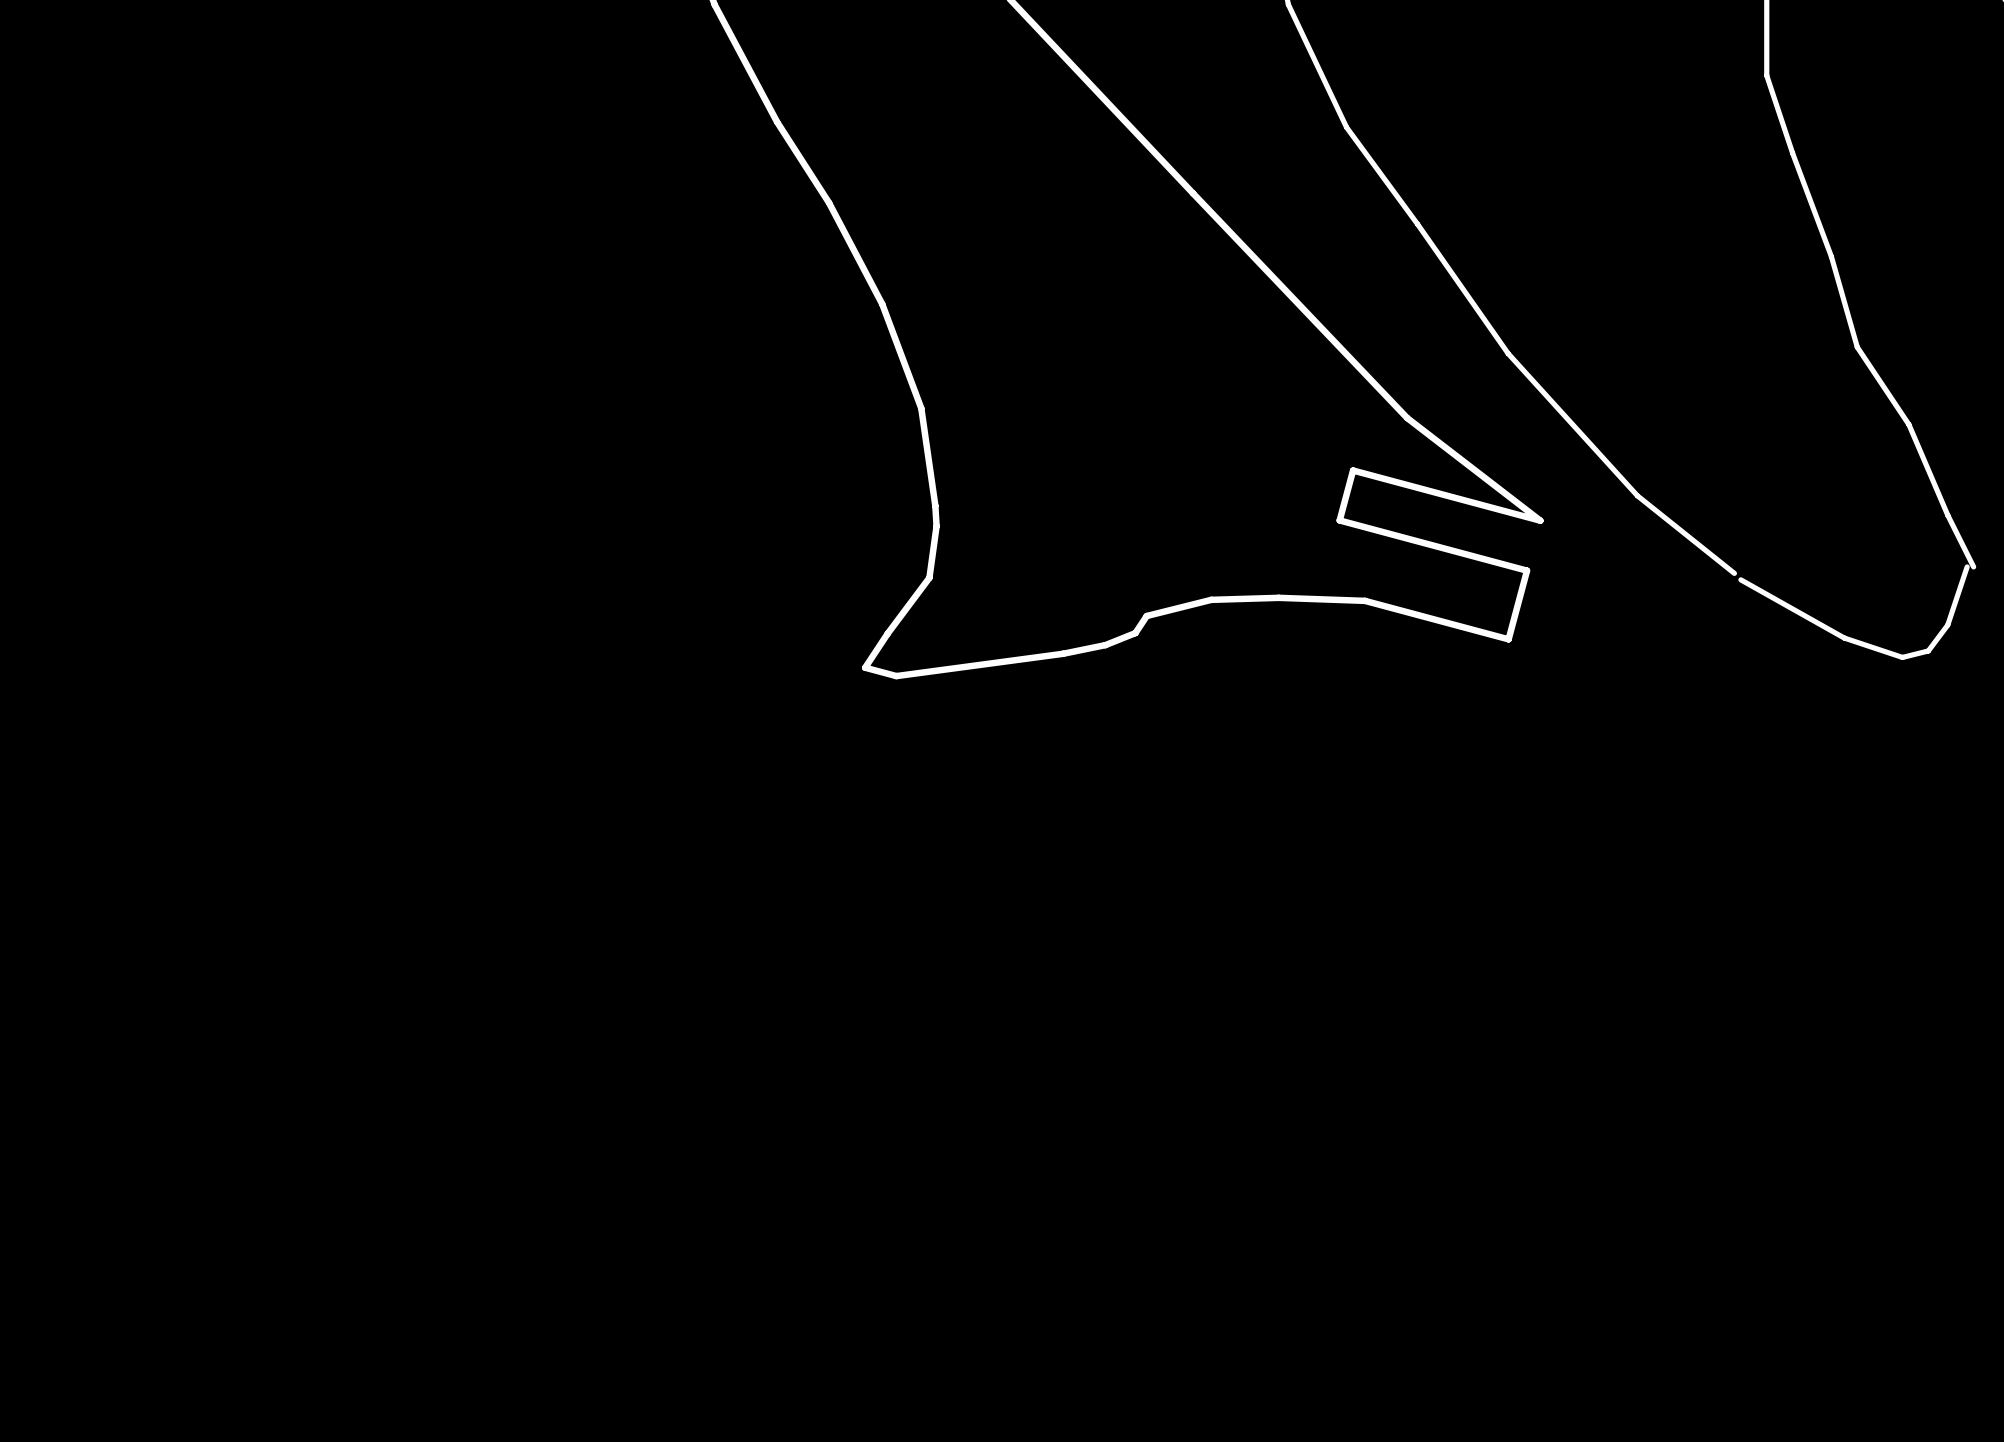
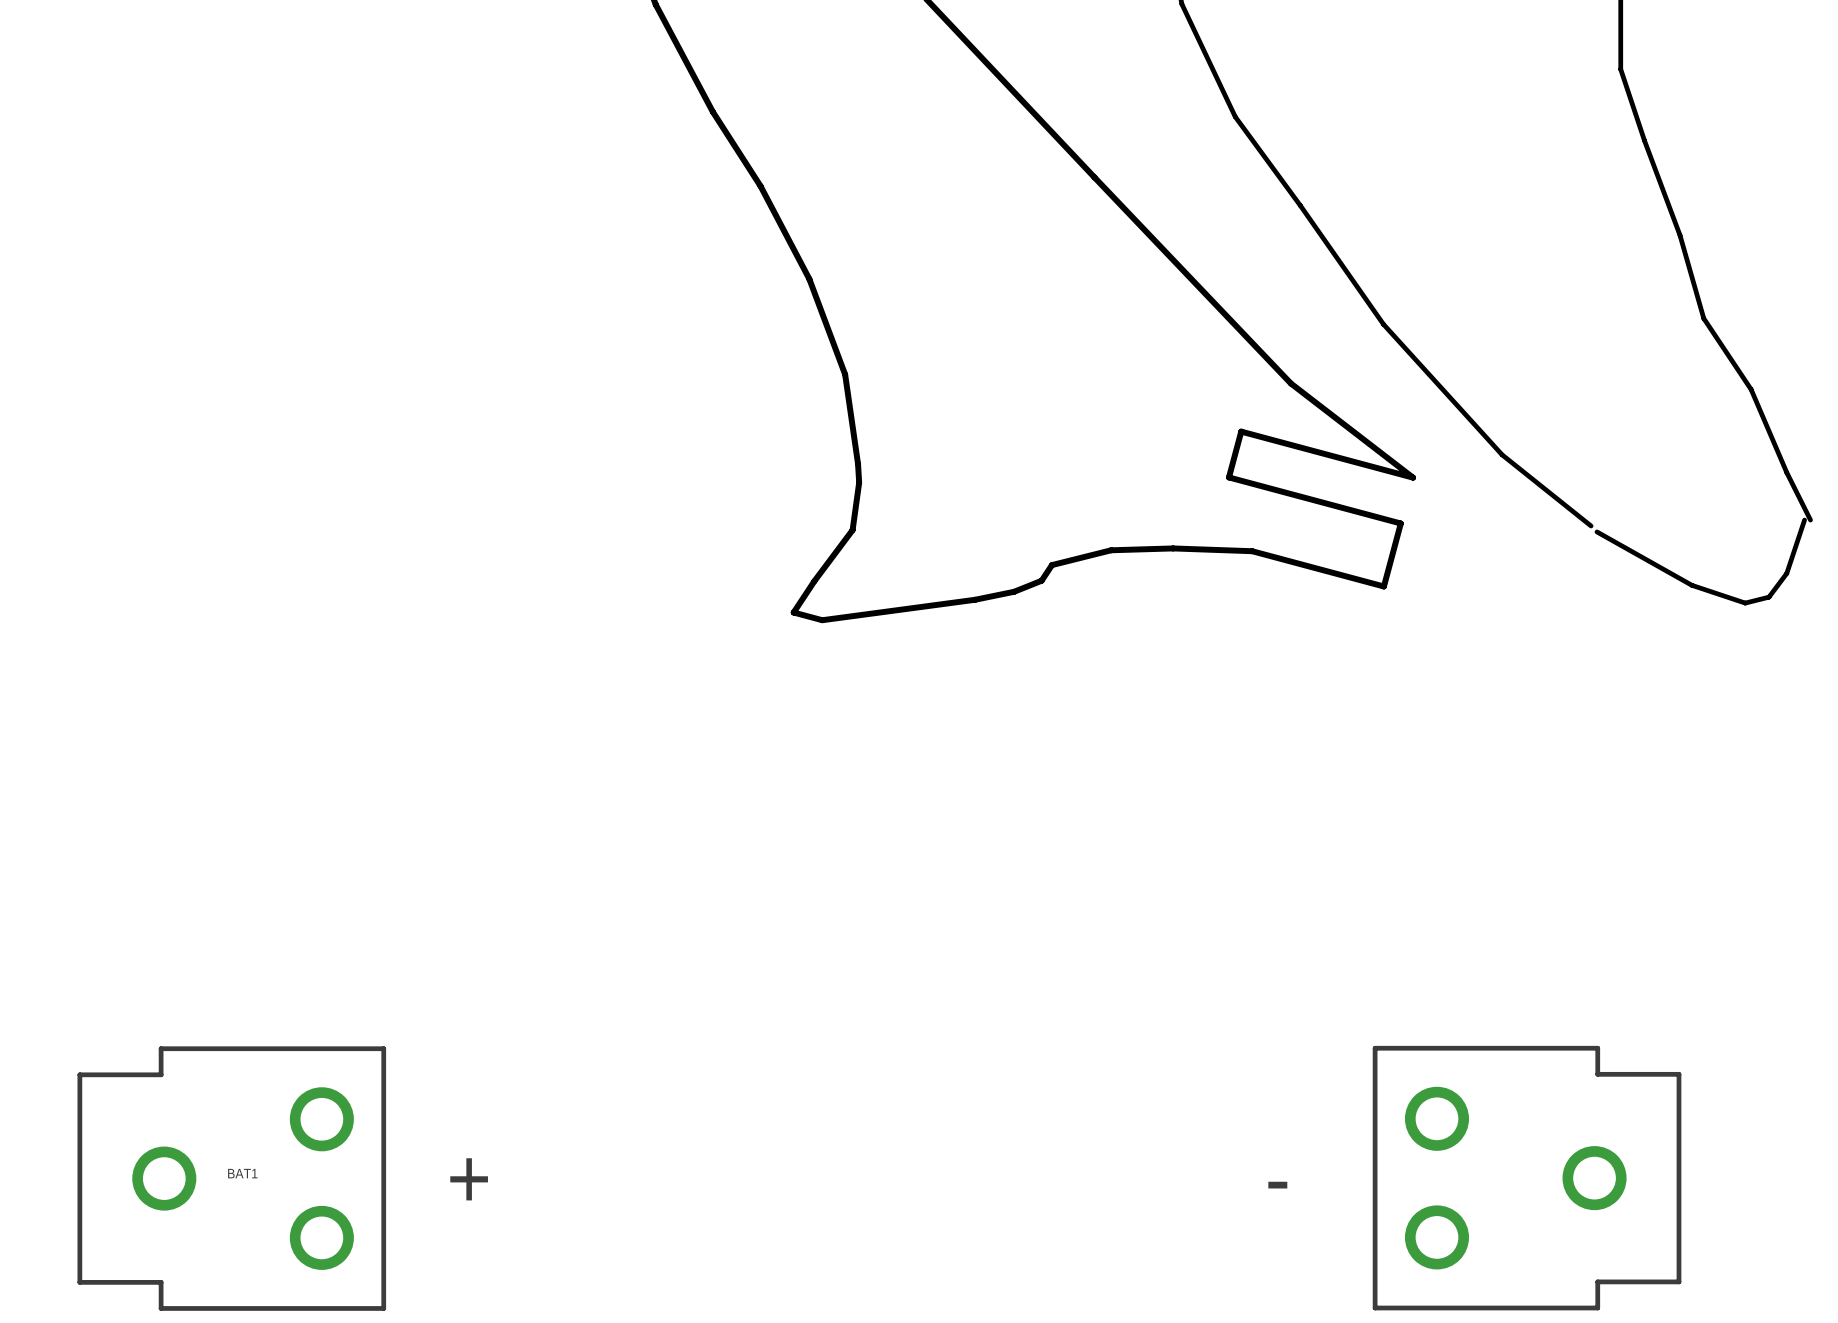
BAT1: none -> (879, 1178)

